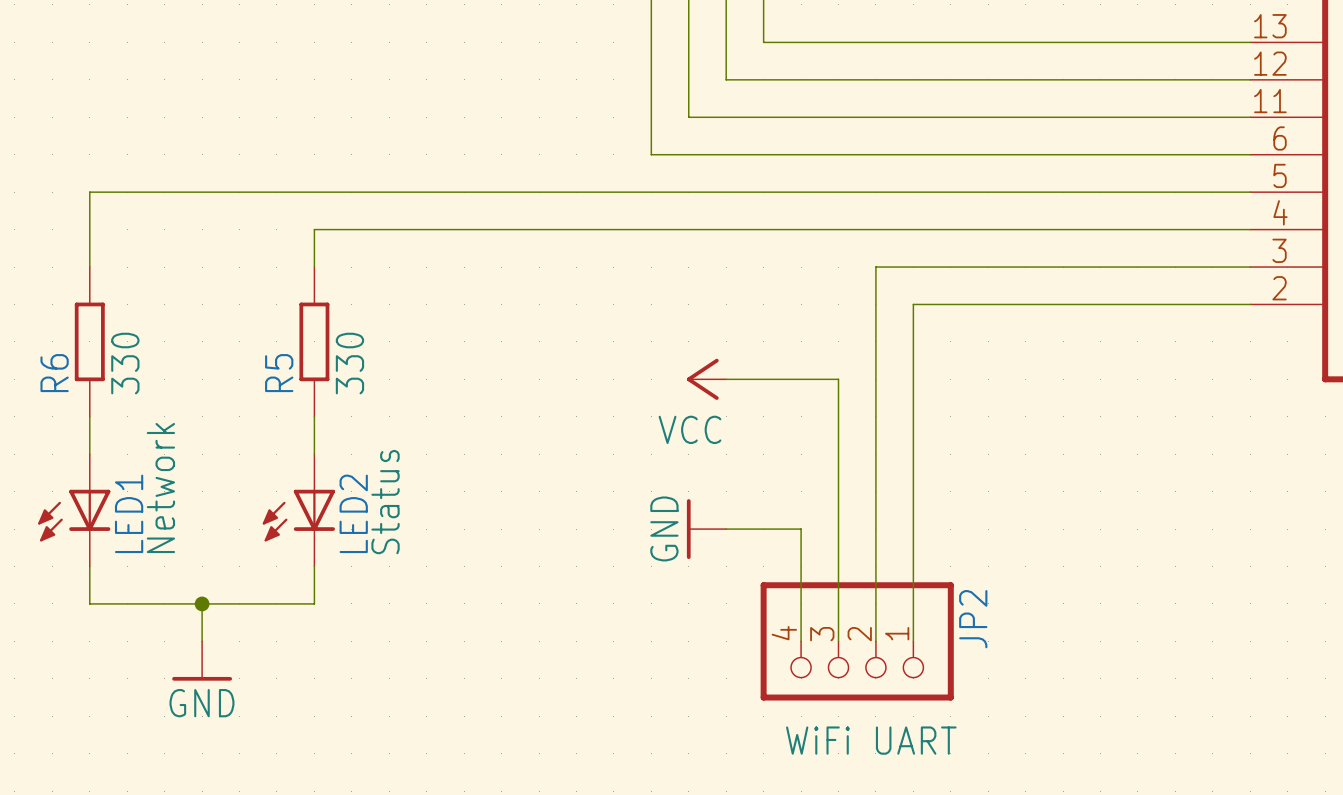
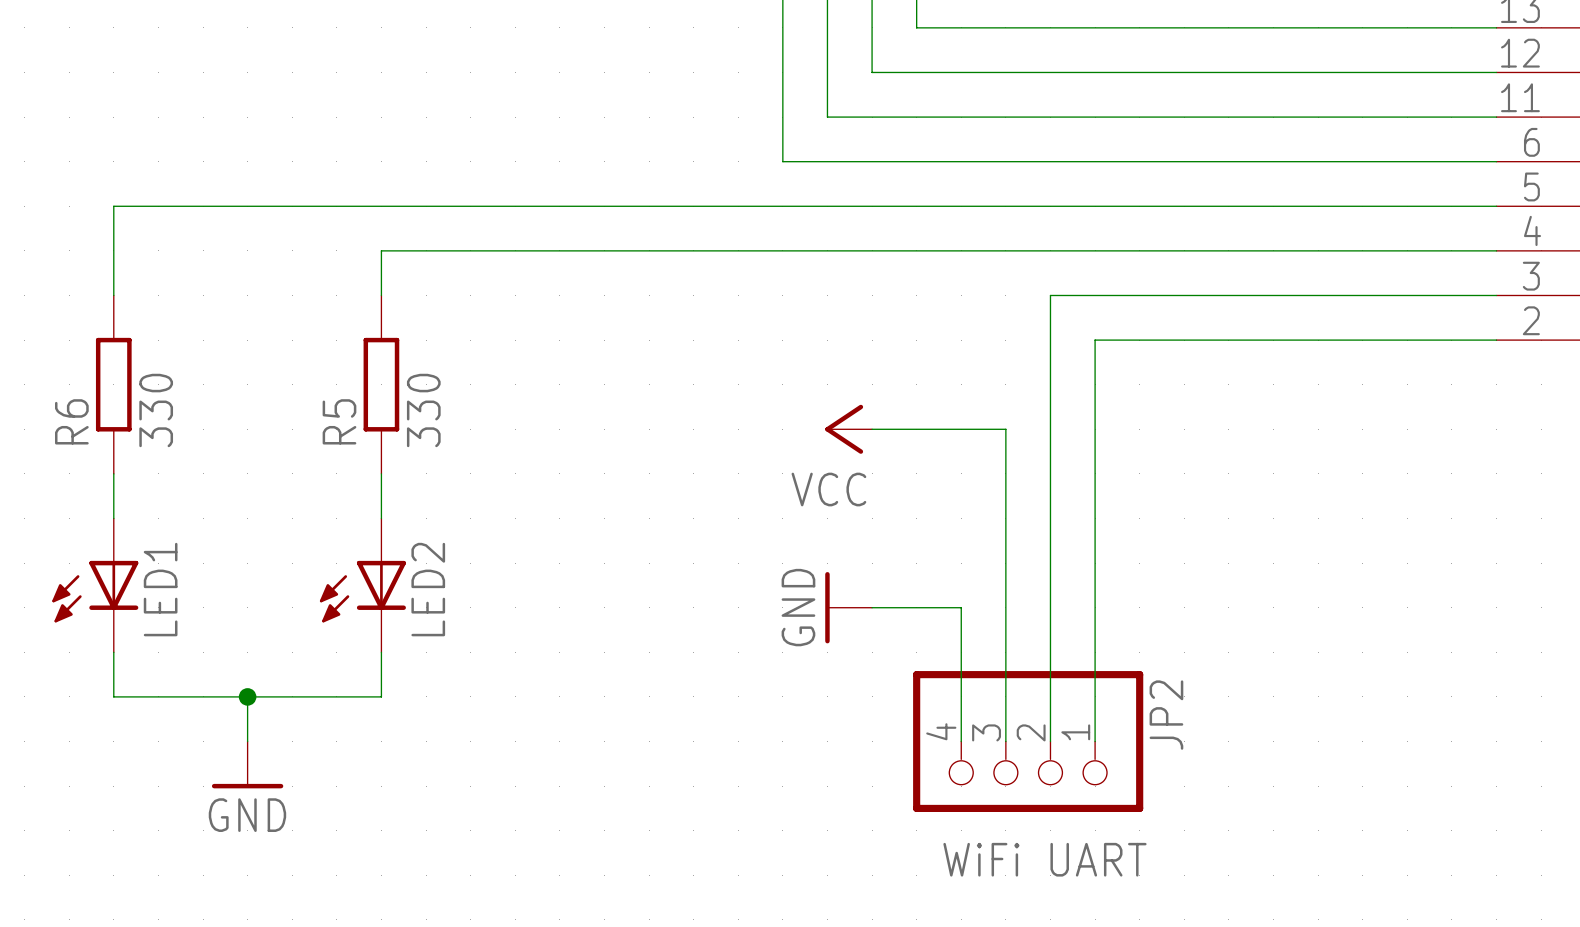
LED1 value: Network (160, 488) -> none
LED2 value: Status (385, 502) -> none

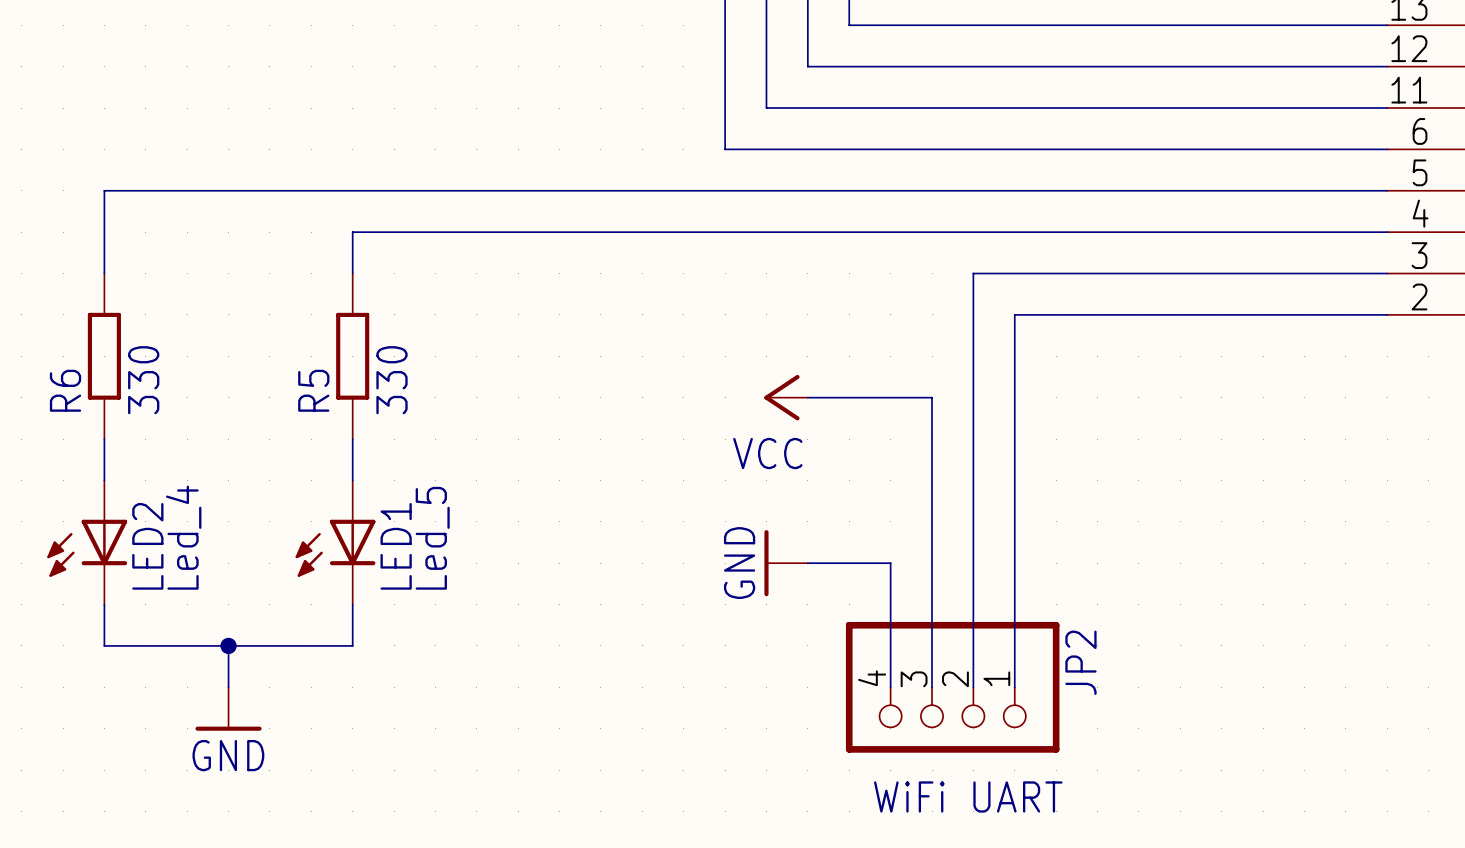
LED1 value: none -> Led_4 (183, 537)
LED2 value: none -> Led_5 (432, 538)
LED1 name: LED1 (160, 589) -> LED2 (147, 546)
LED2 name: LED2 (428, 589) -> LED1 (396, 546)

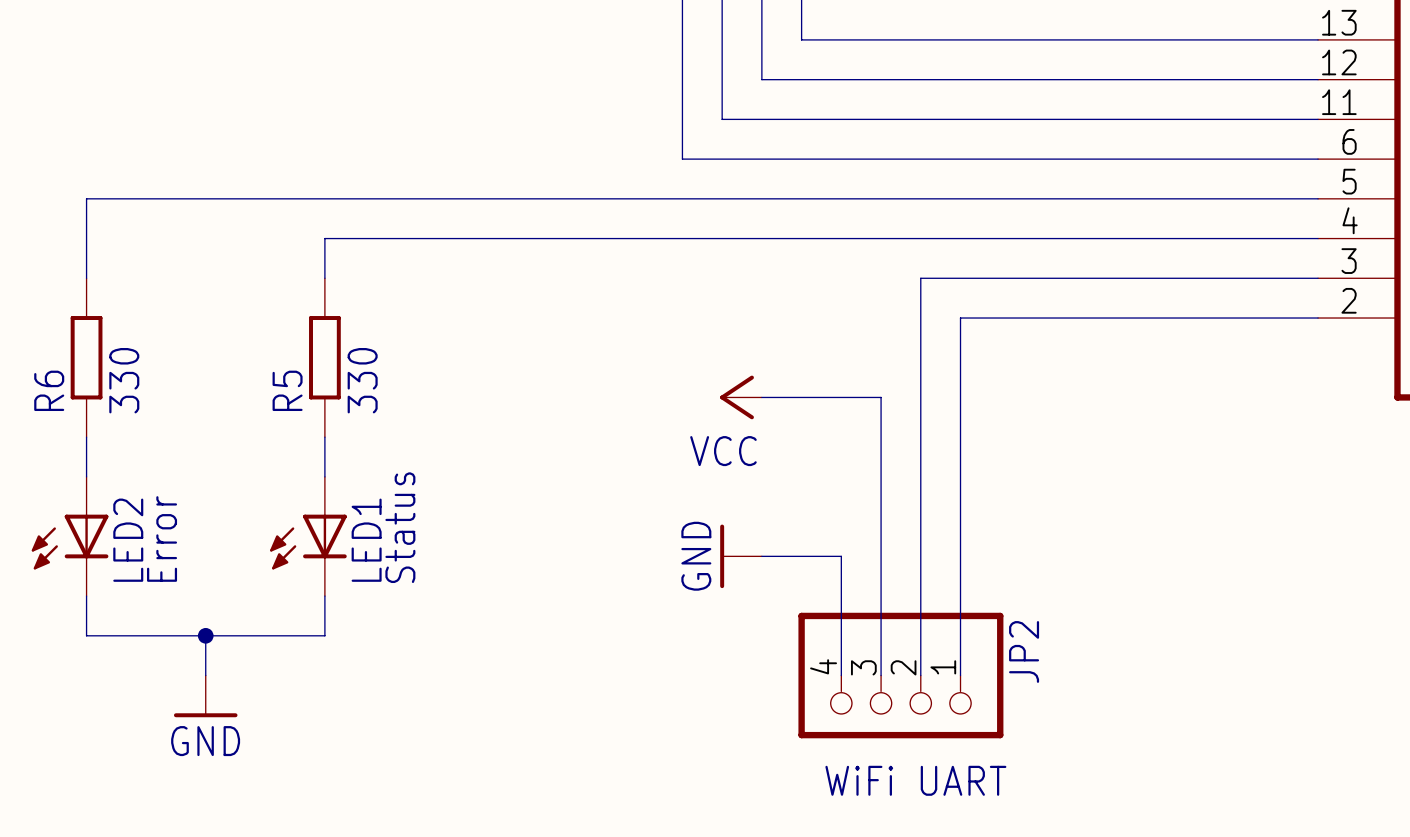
LED2 value: Led_4 (183, 537) -> Error (162, 539)
LED1 value: Led_5 (432, 538) -> Status (400, 527)

